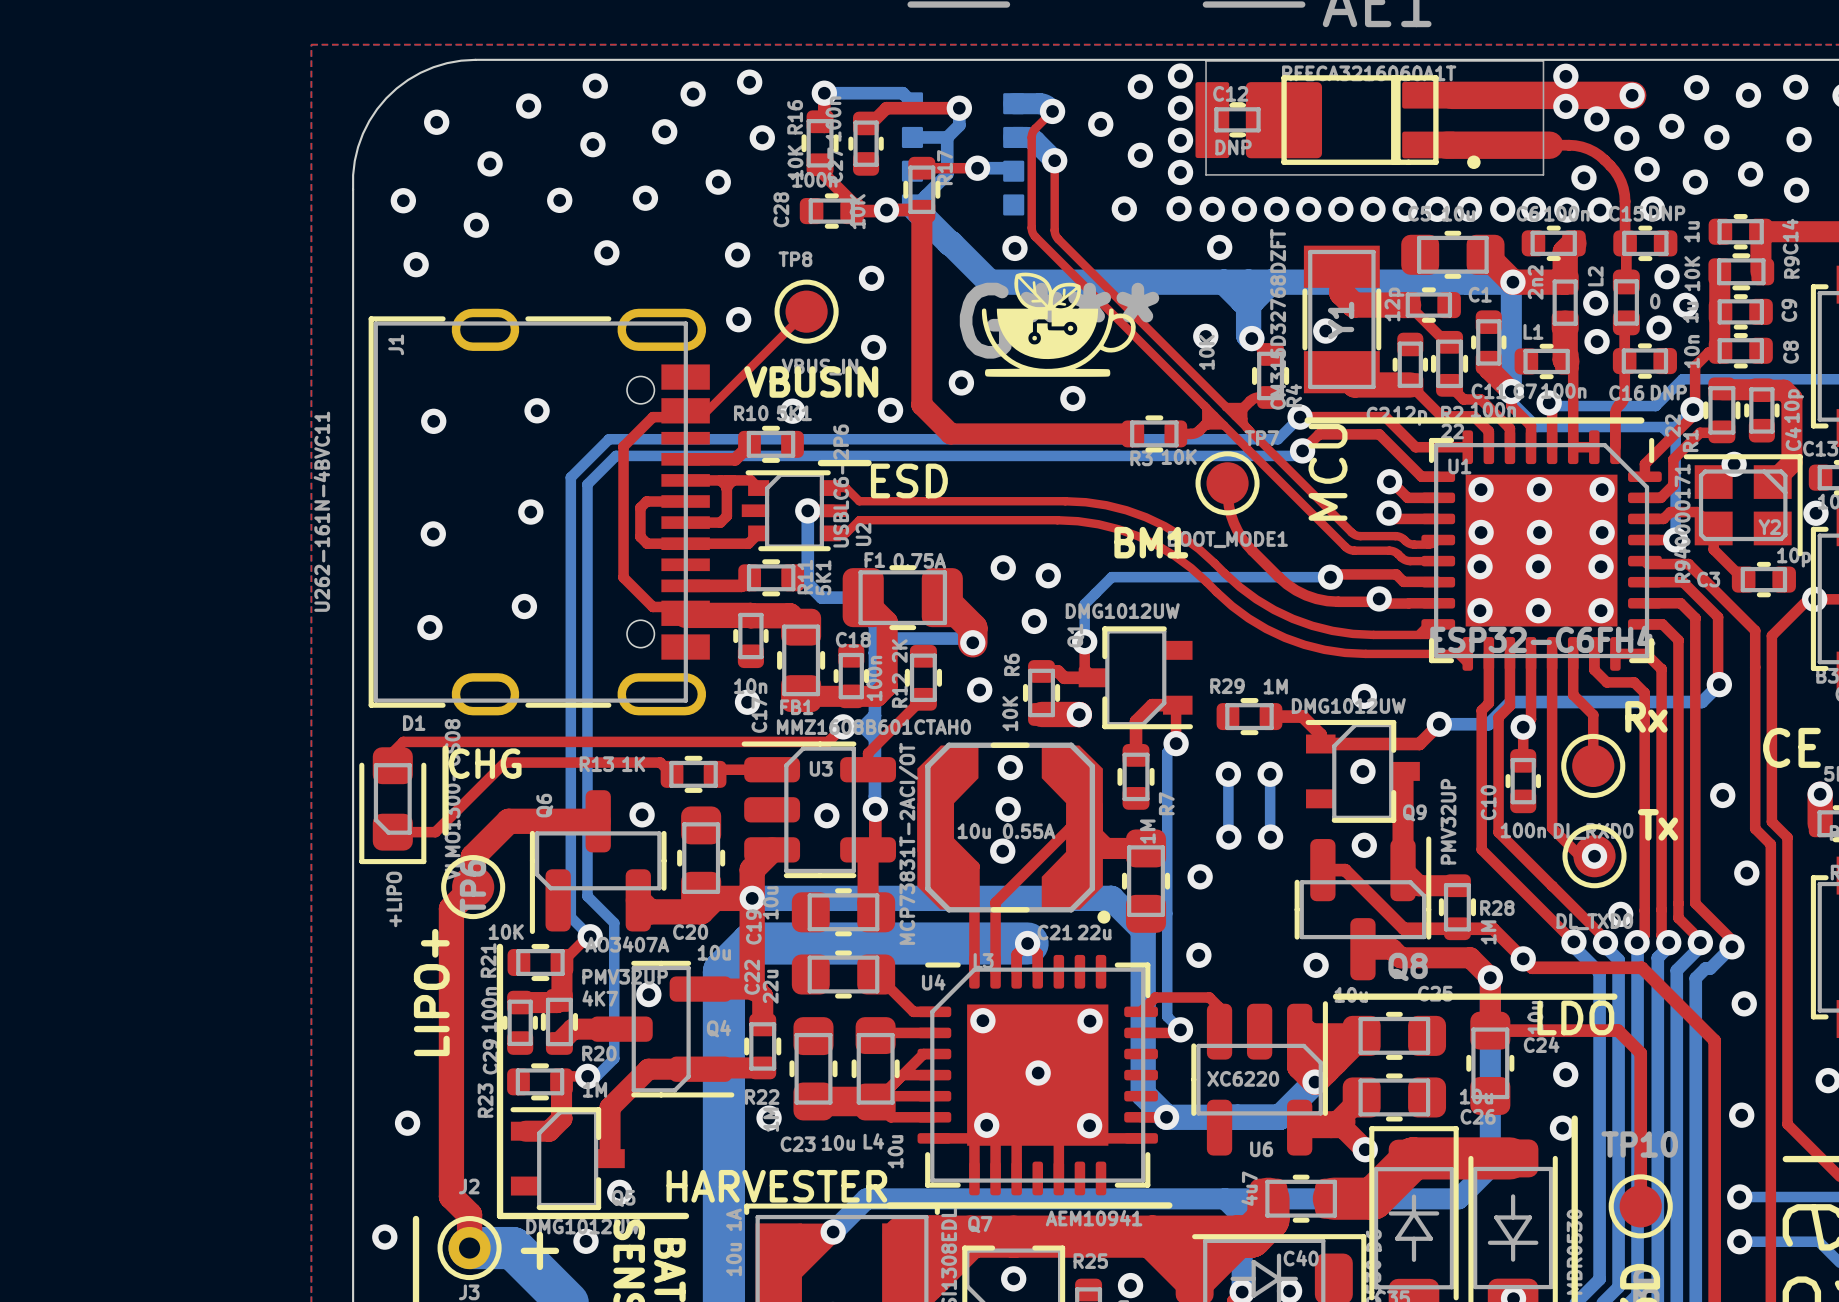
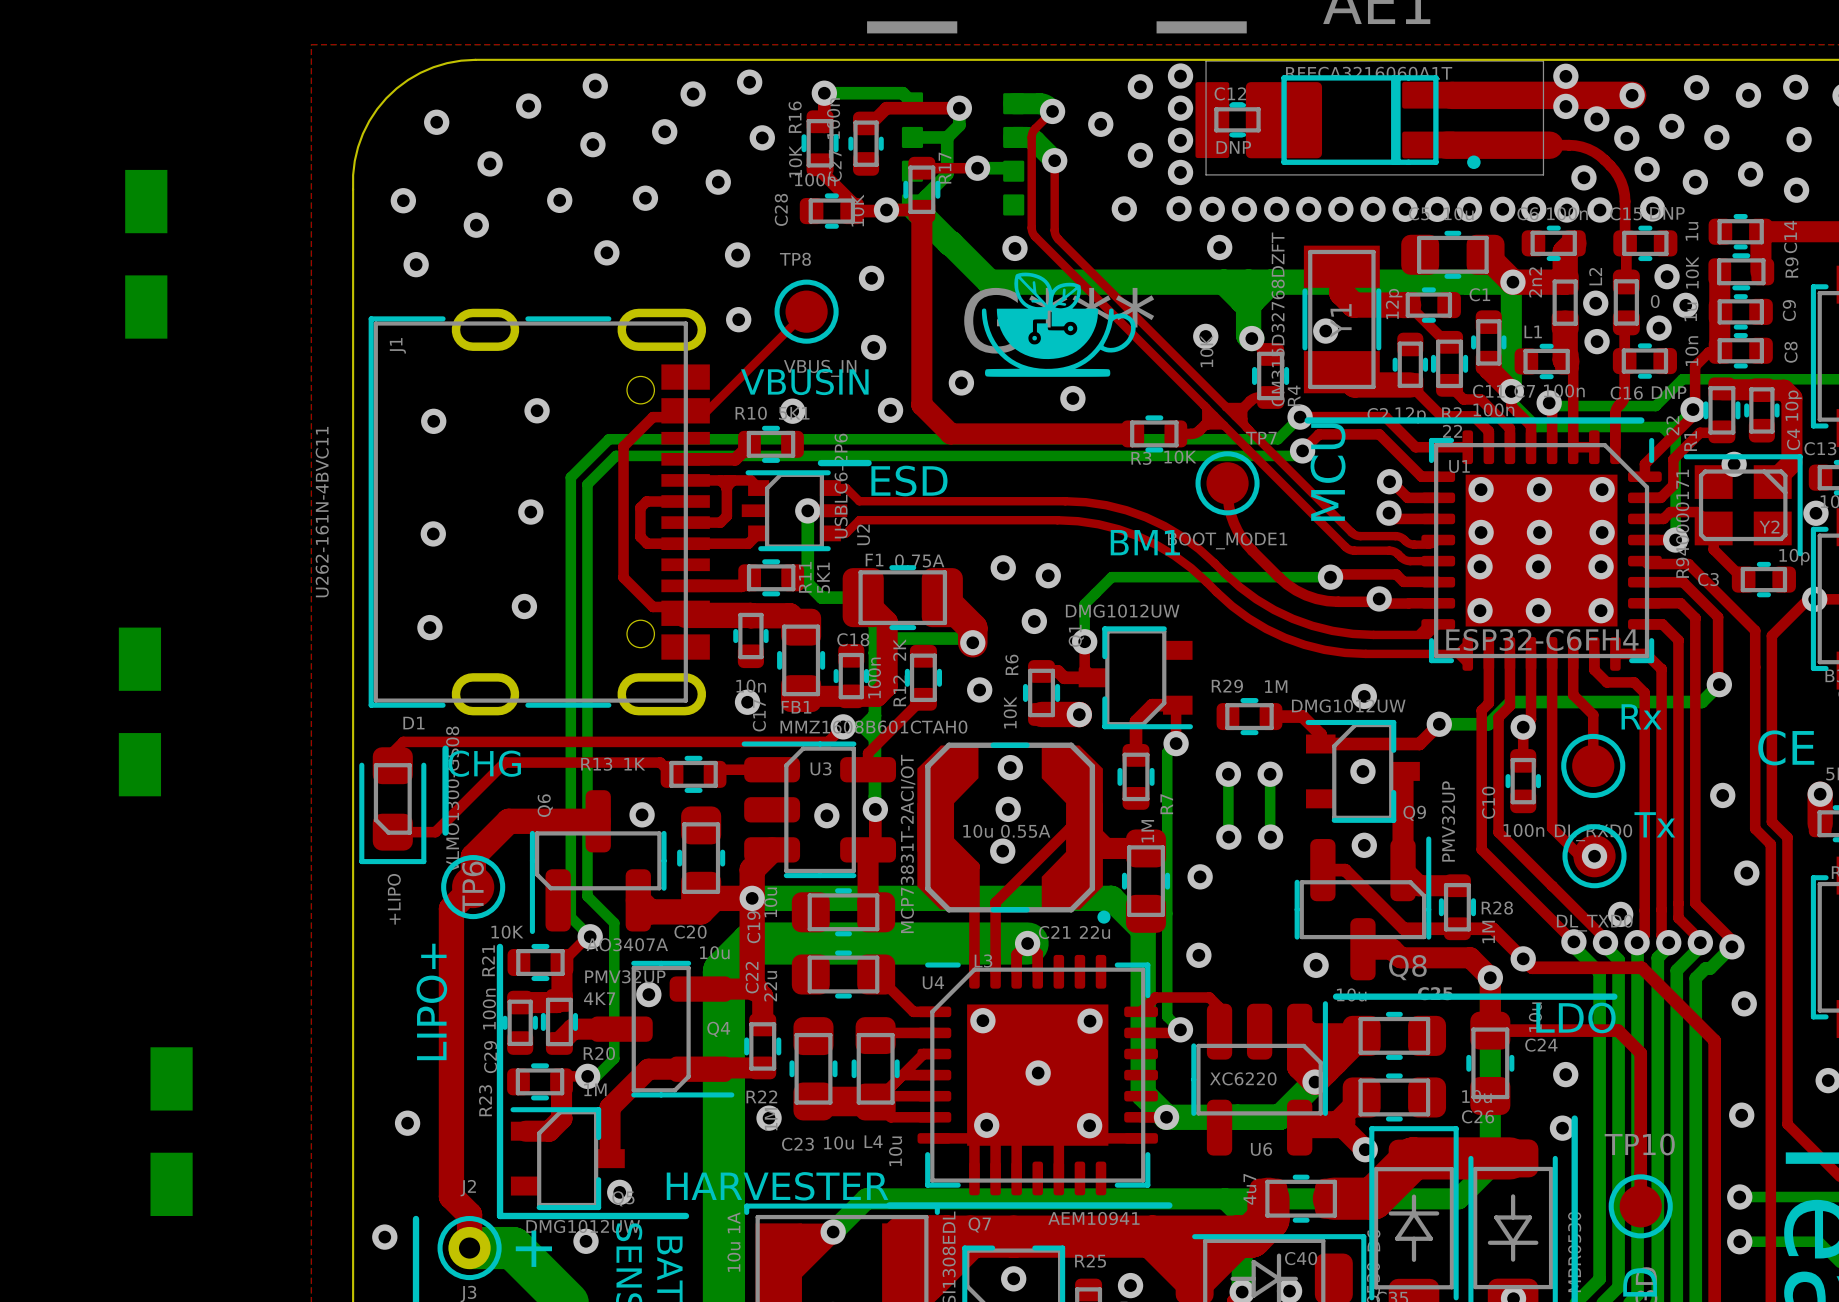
part: none -> (146, 254)
part: none -> (139, 711)
part: none -> (171, 1131)

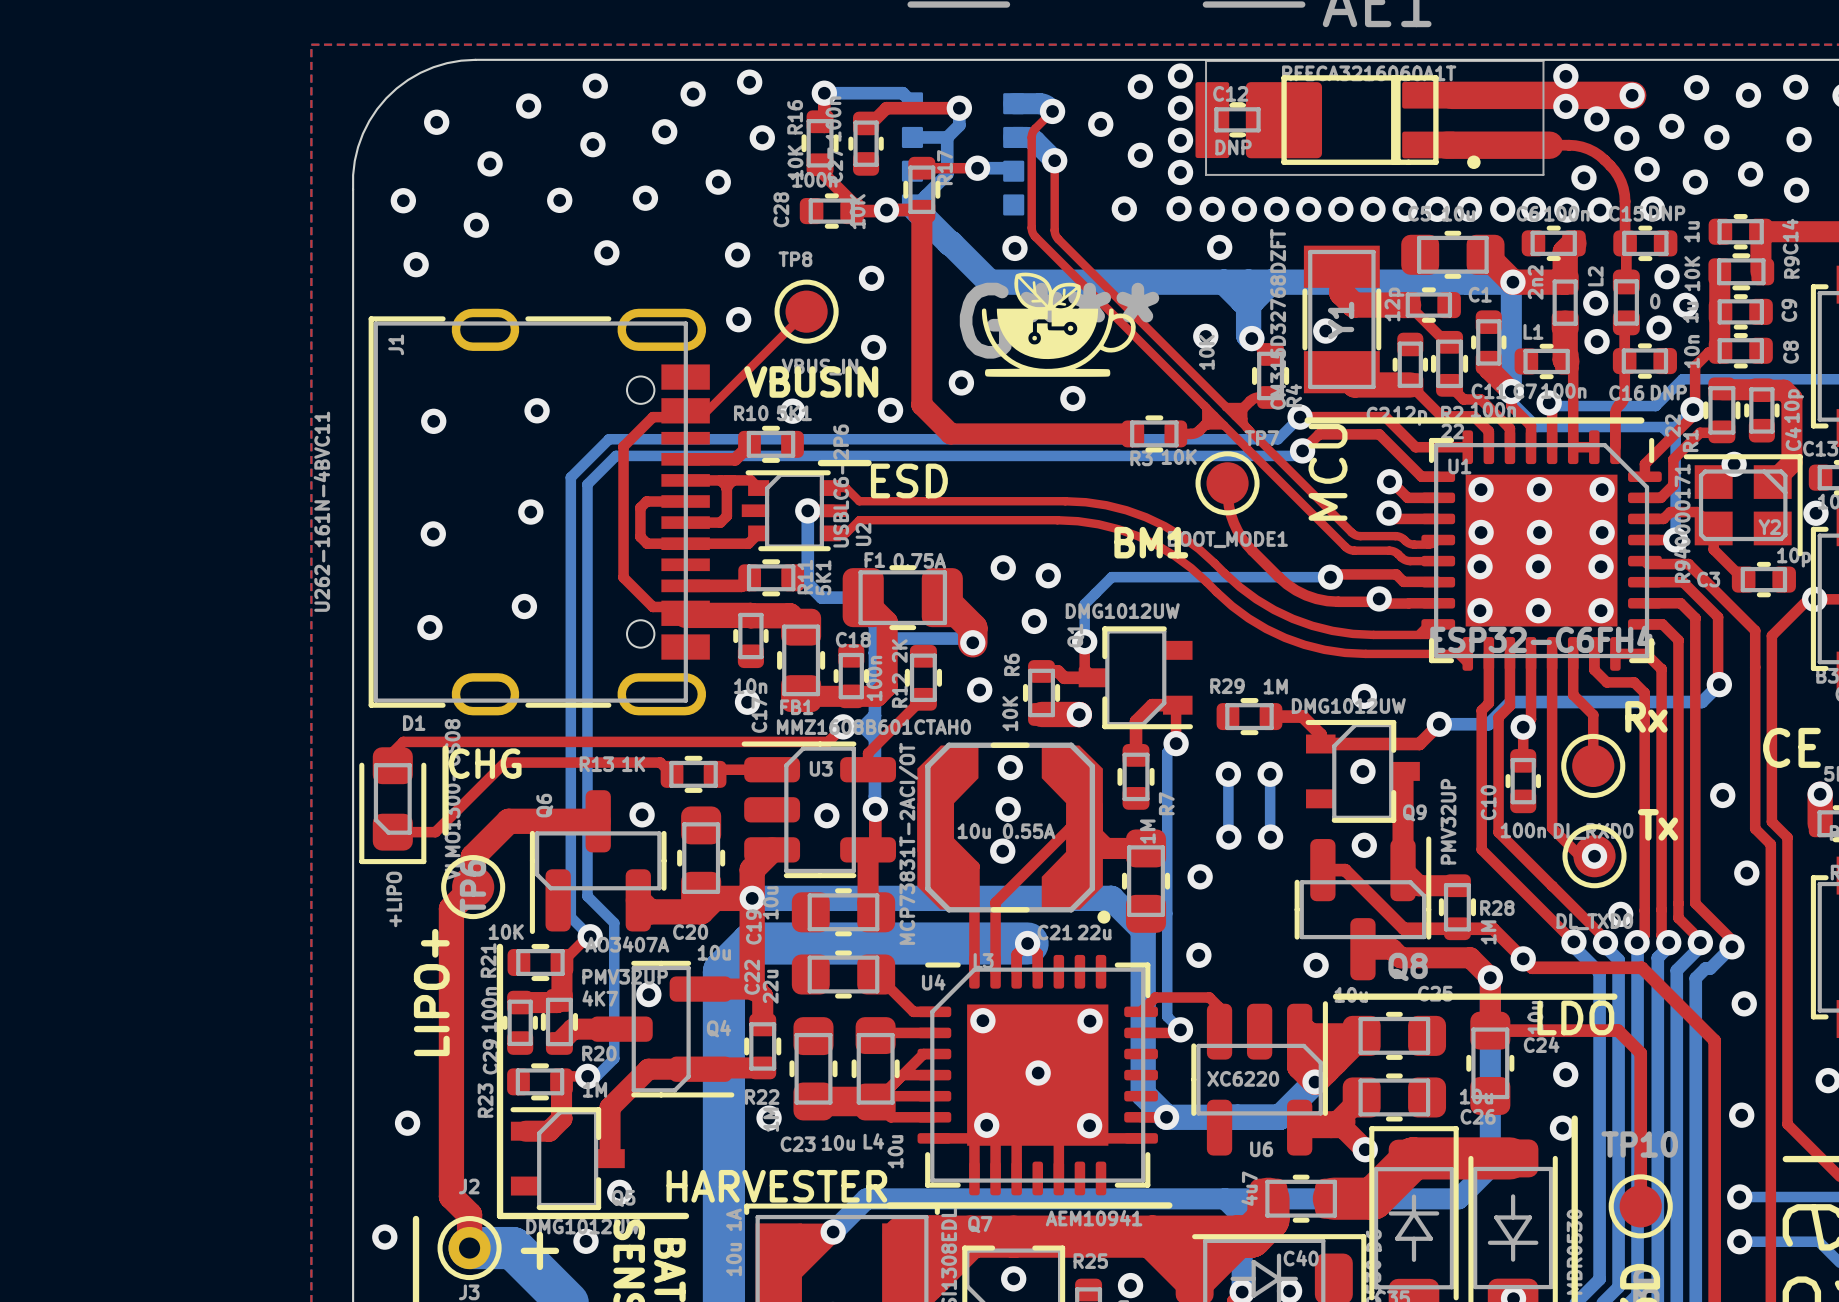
part: (146, 254) -> none
part: (139, 711) -> none
part: (171, 1131) -> none

